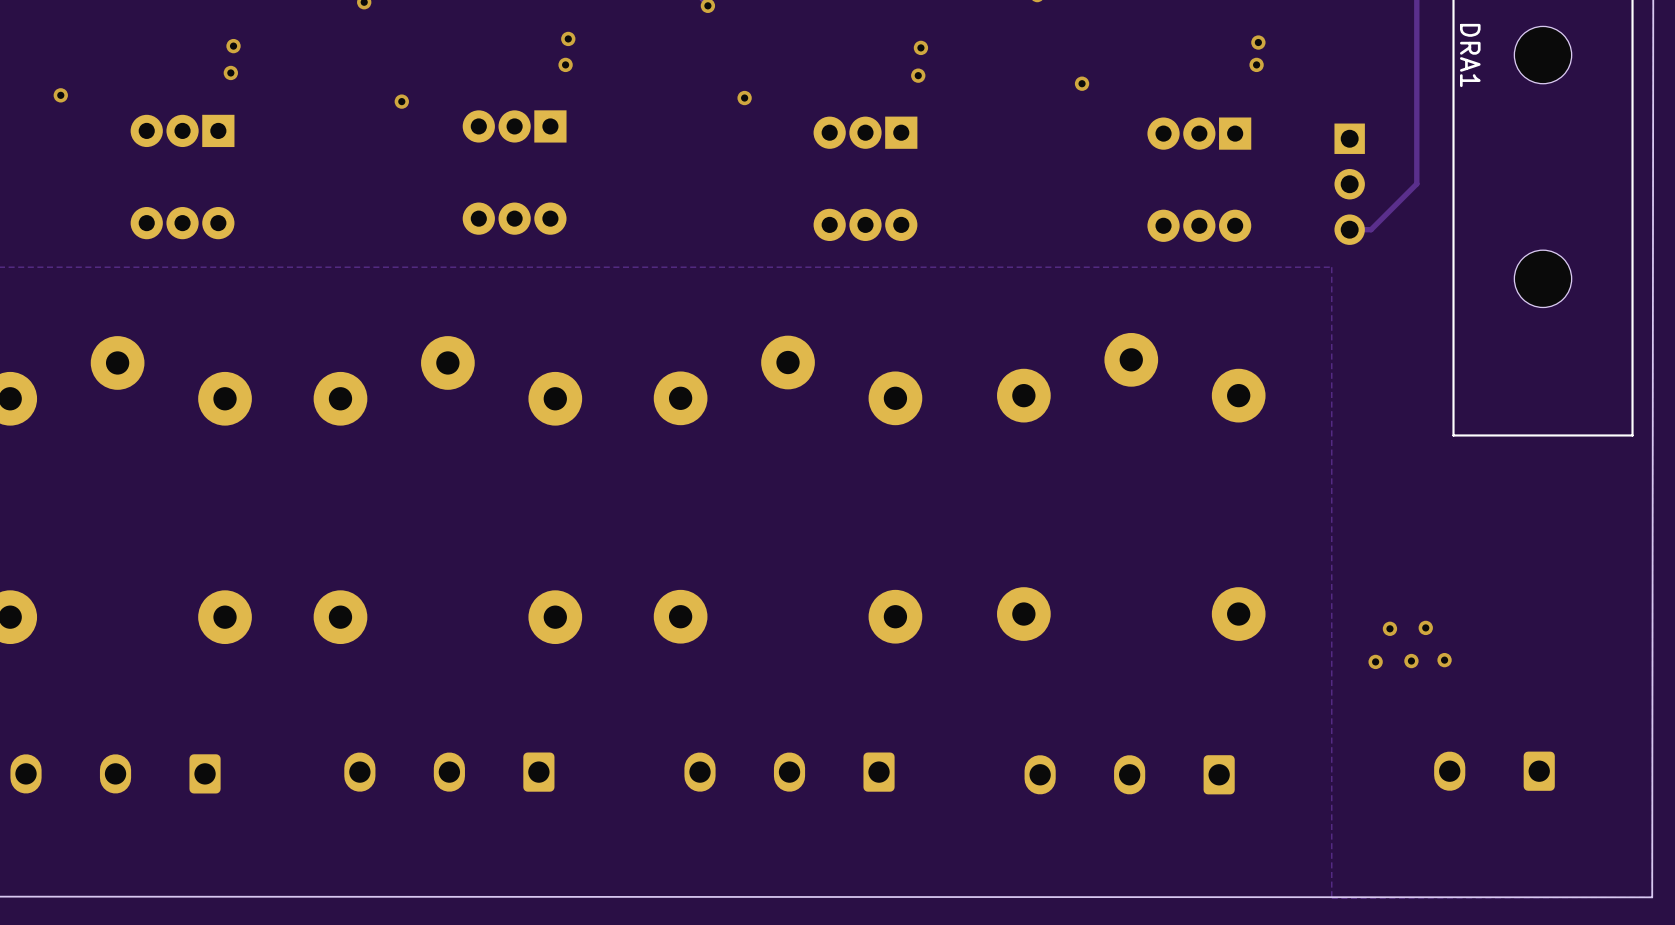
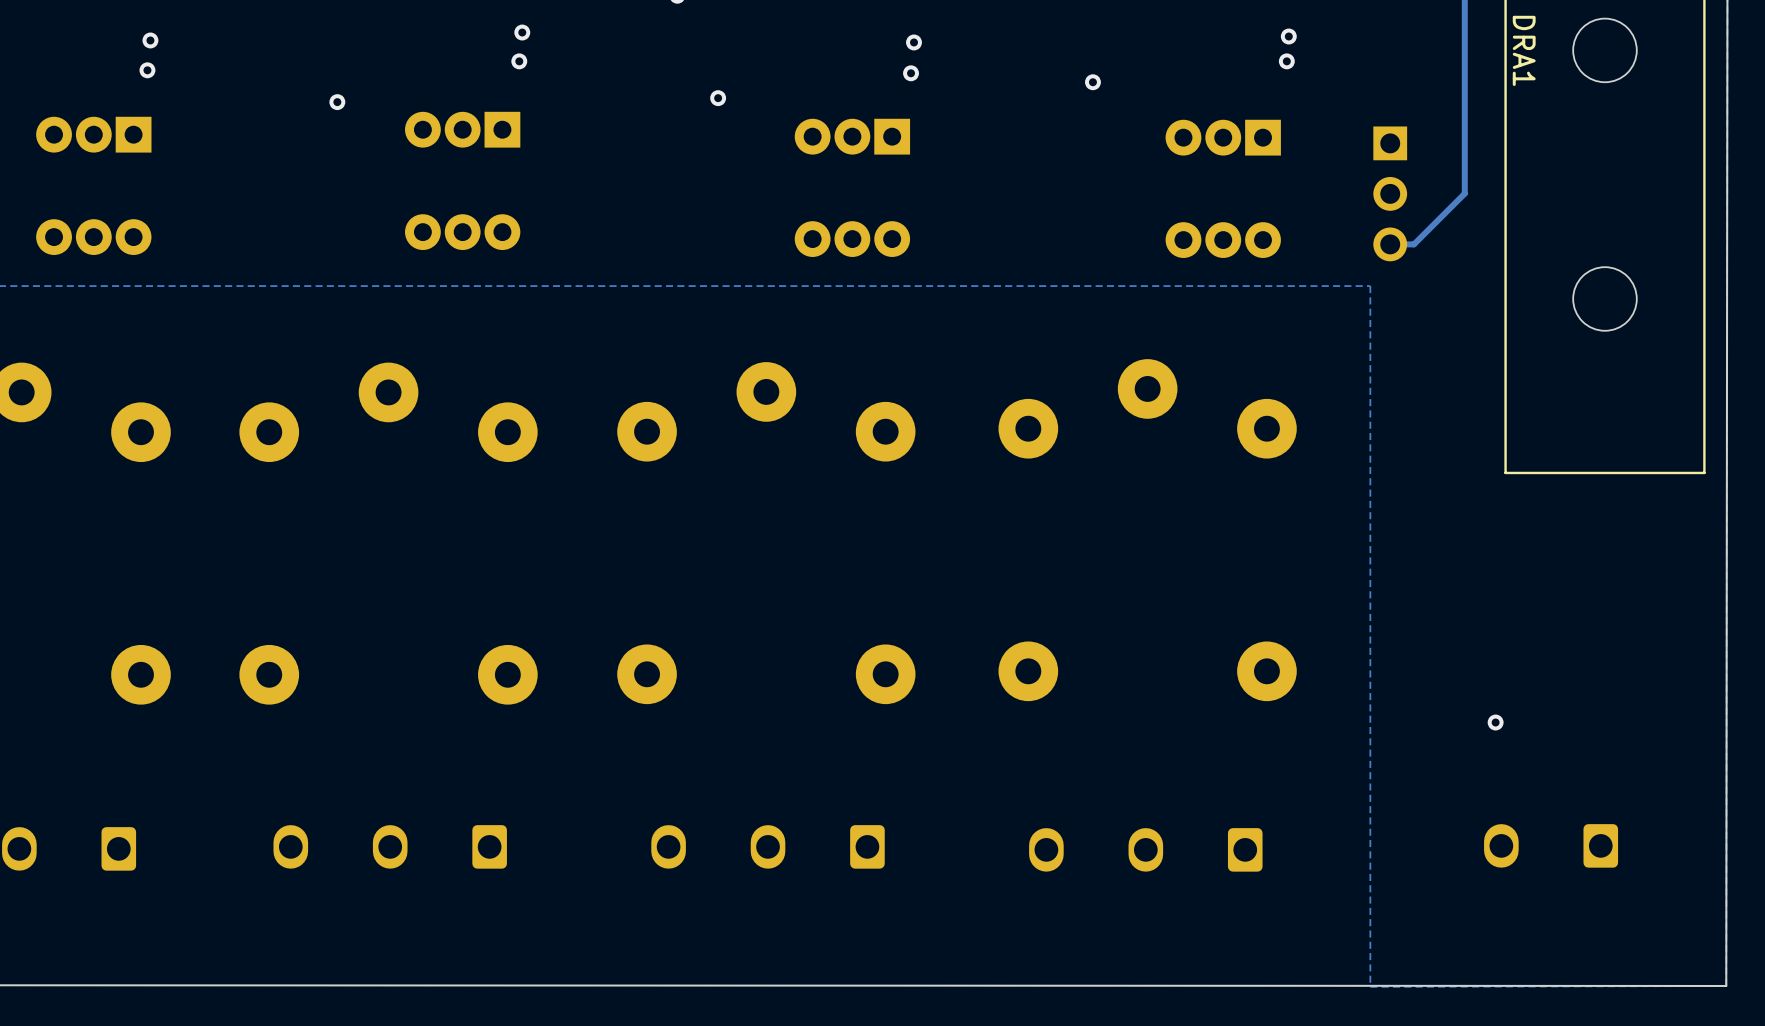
via: (1425, 627) -> none
via: (1389, 628) -> none
via: (1375, 661) -> none
via: (1411, 661) -> none

